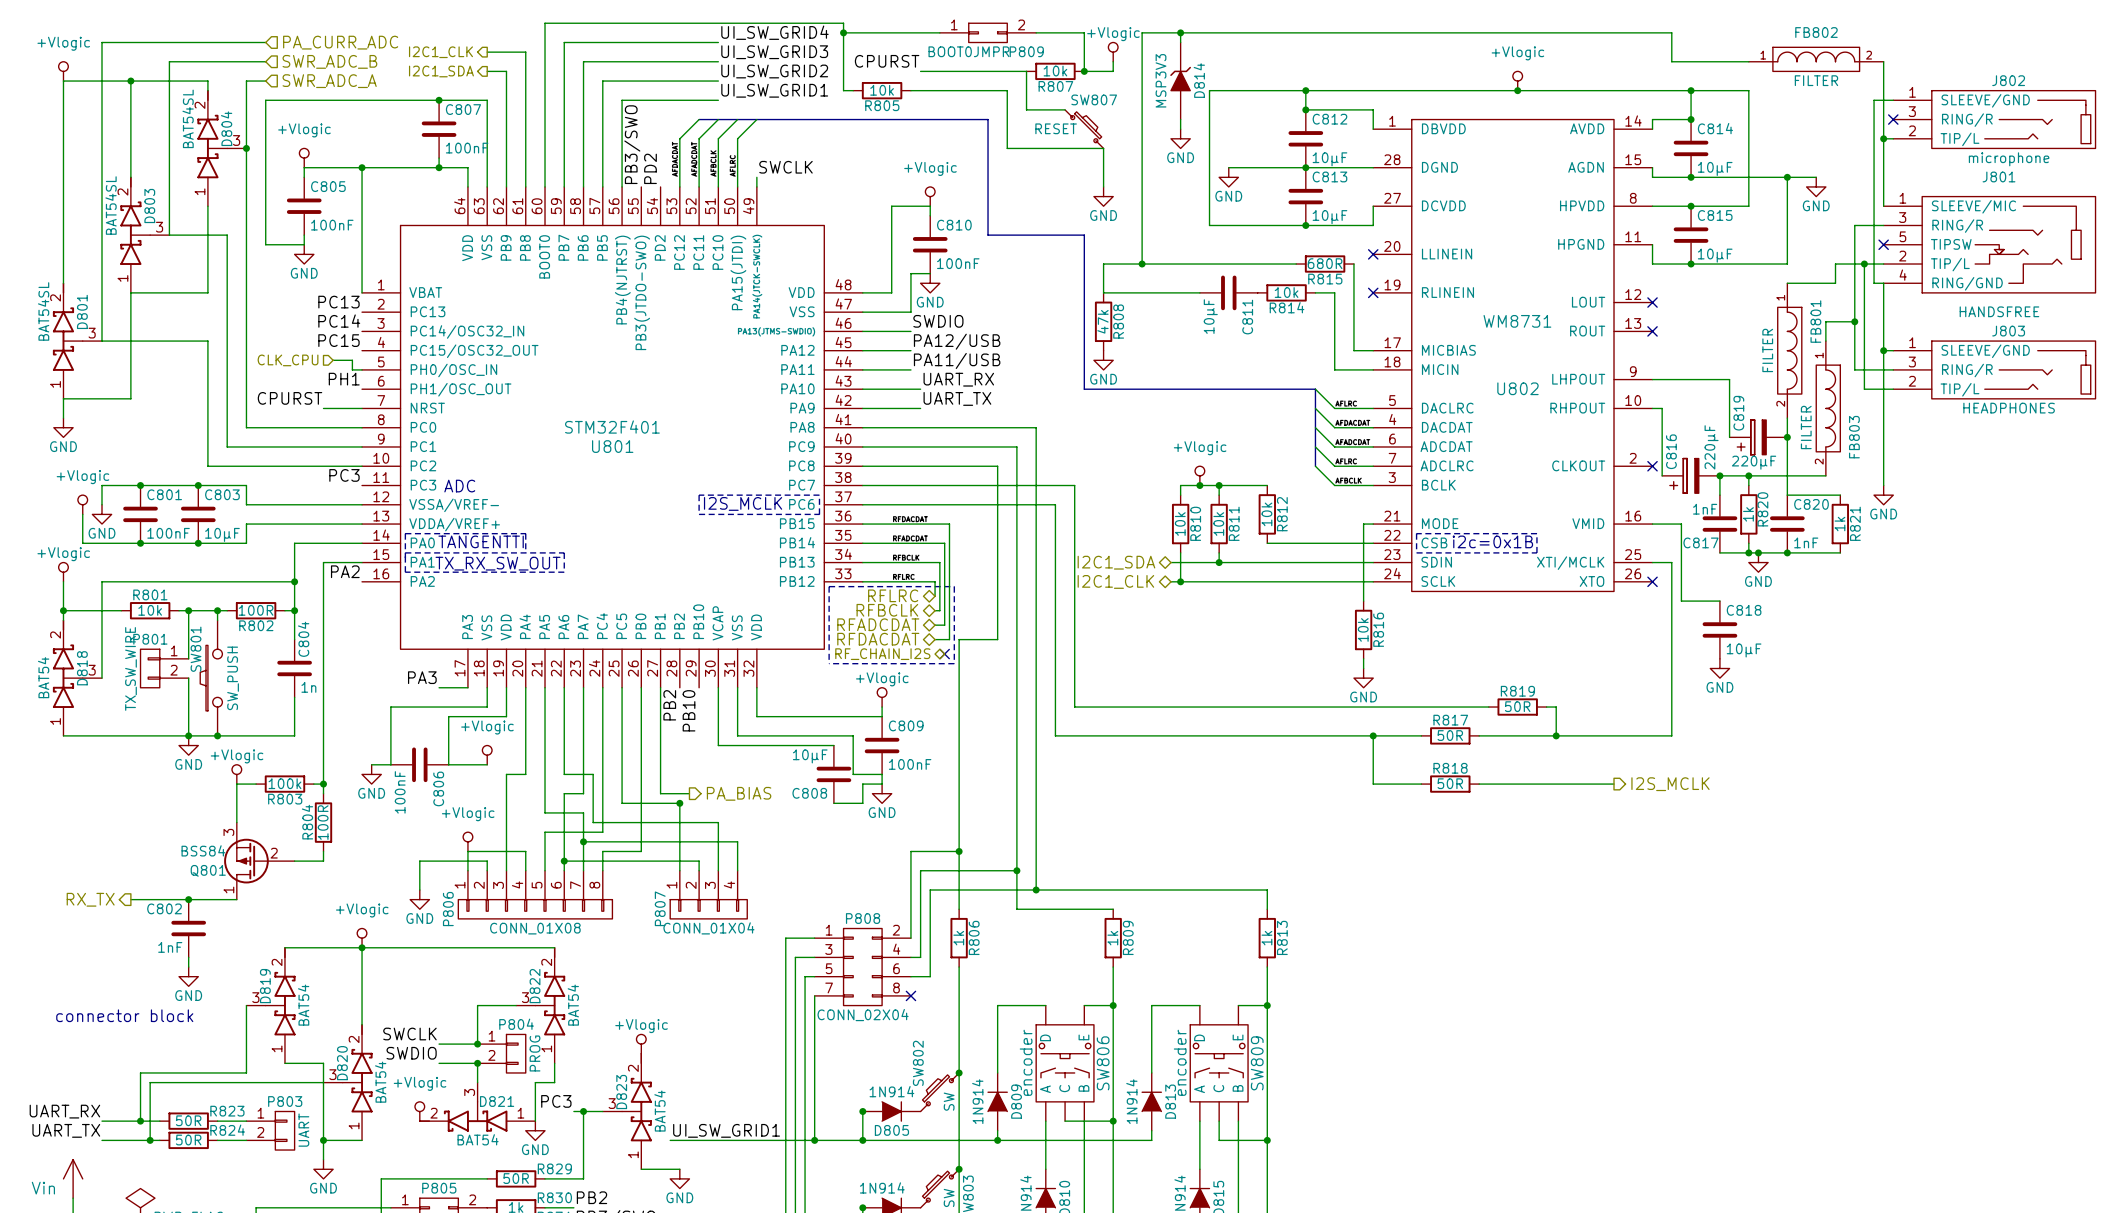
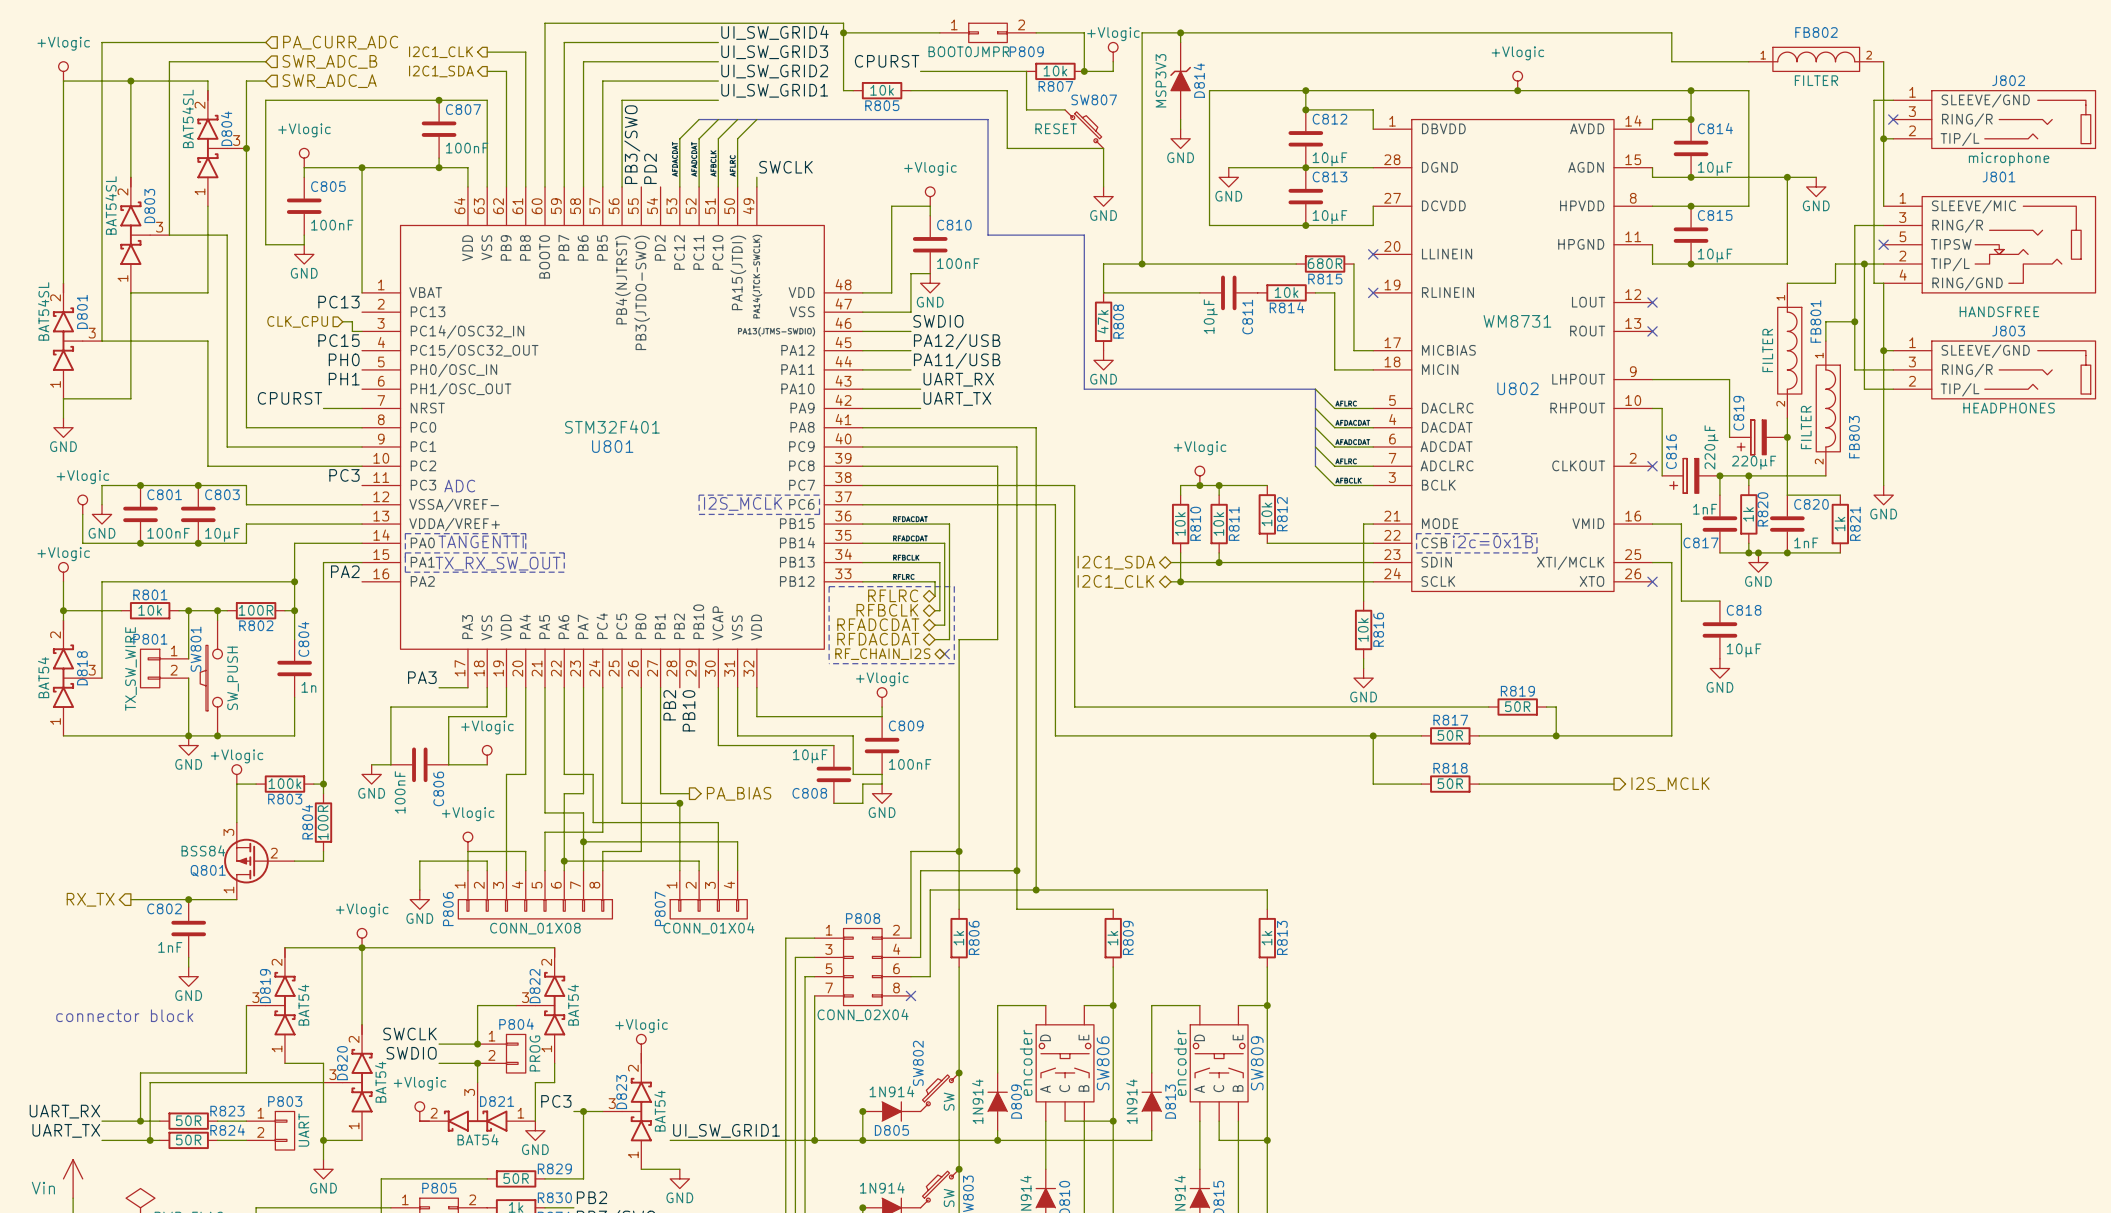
label: PC14 (339, 321) -> none
wire: none -> (342, 321) (352, 321) (352, 331) (362, 331)
label: none -> PH0 (344, 359)
hierarchical label position: CLK_CPU (288, 360) -> CLK_CPU (297, 321)
wire: (333, 360) (352, 360) (352, 369) (362, 369) -> none

